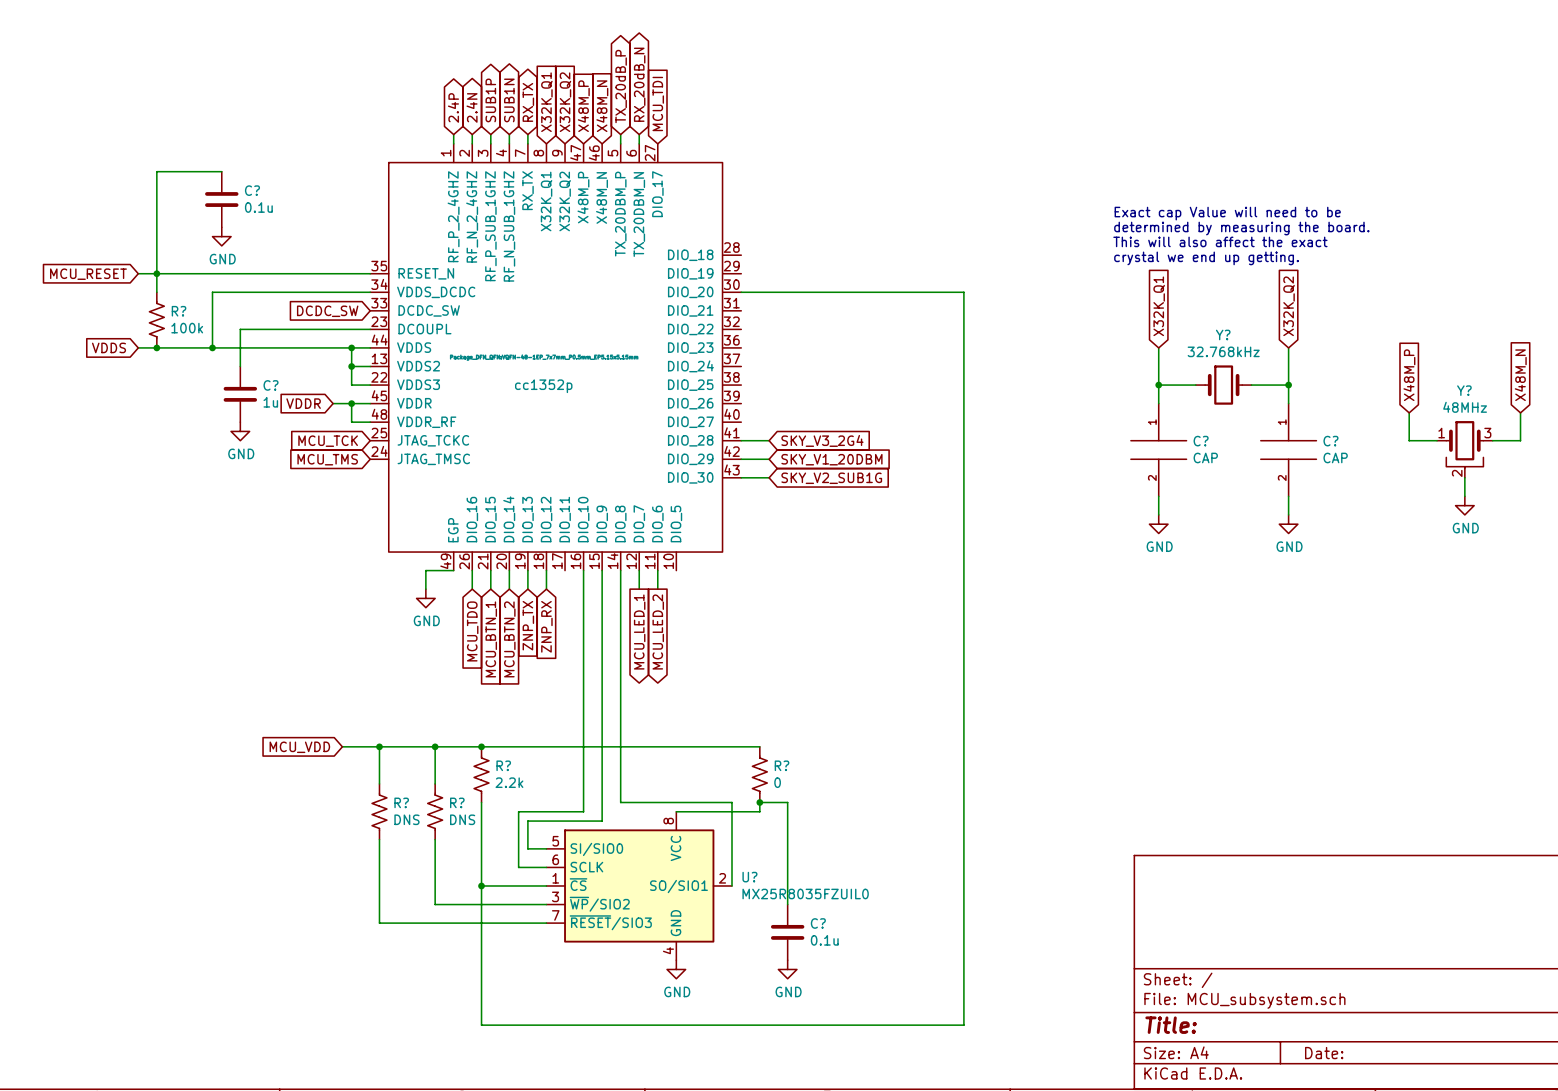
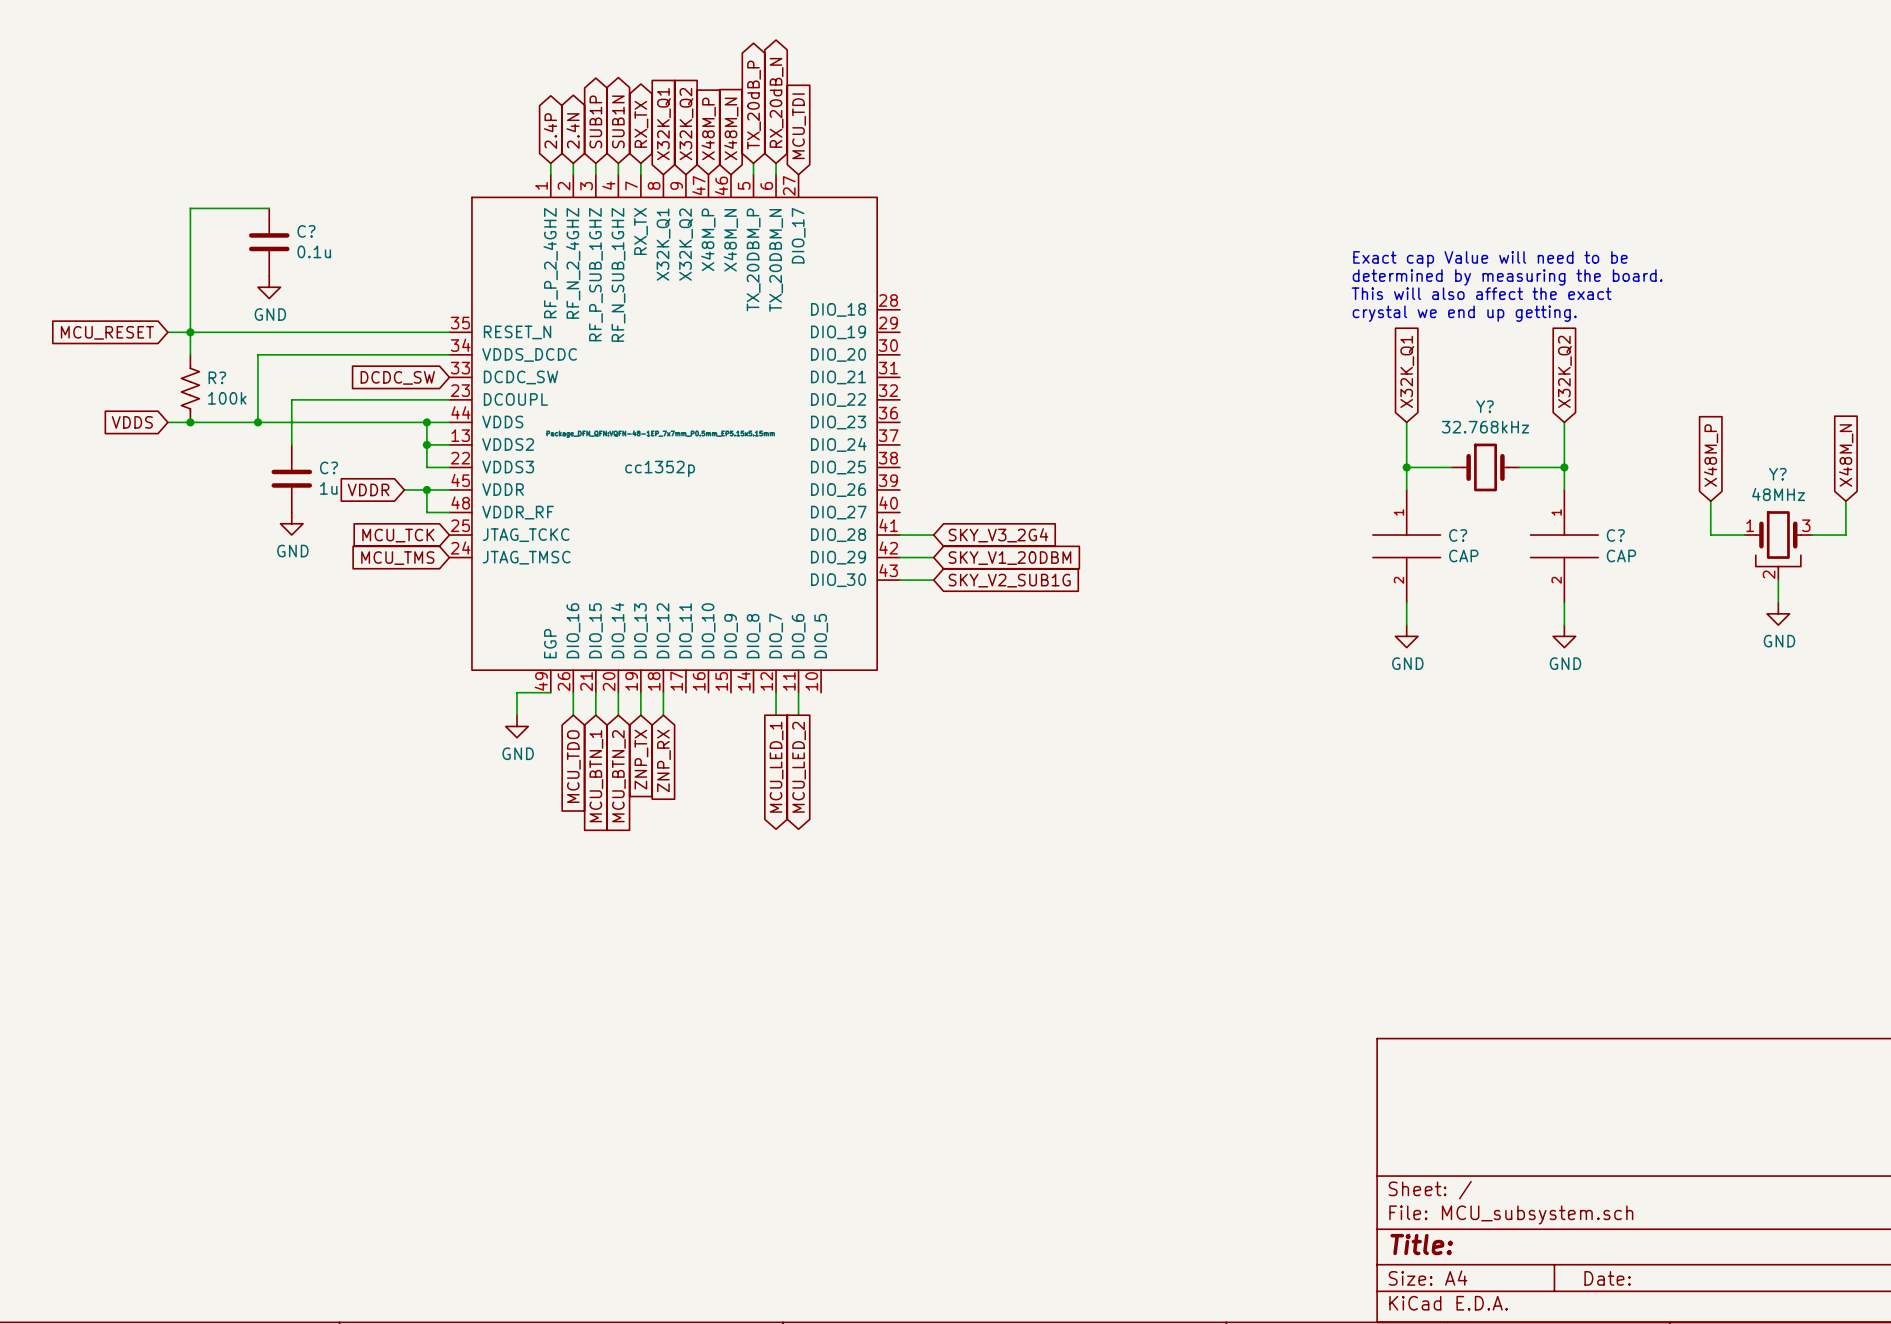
wire: (741, 292) (963, 292) (963, 1025) (481, 1025) (481, 802) -> none
wire: (583, 570) (583, 811) (518, 811) (518, 867) (546, 867) -> none
wire: (602, 570) (602, 821) (527, 821) (527, 848) (546, 848) -> none
wire: (620, 570) (620, 802) (732, 802) (732, 885) -> none
wire: (342, 746) (759, 746) -> none
wire: (379, 746) (379, 783) -> none
junction: (379, 746) -> none
wire: (435, 746) (435, 783) -> none
junction: (435, 746) -> none
junction: (481, 746) -> none
global label: MCU_VDD (299, 747) -> none
R?: 2.2k (481, 774) -> none
R?: 0 (759, 774) -> none
junction: (759, 802) -> none
R?: DNS (379, 811) -> none
R?: DNS (435, 811) -> none
wire: (676, 811) (759, 811) (759, 802) (787, 802) (787, 904) -> none
wire: (379, 839) (379, 923) (546, 923) -> none
wire: (435, 839) (435, 904) (546, 904) -> none
wire: (481, 885) (546, 885) -> none
junction: (481, 885) -> none
U?: MX25R8035FZUIL0 (639, 885) -> none
C?: 0.1u (787, 932) -> none
power symbol: GND (676, 969) -> none
power symbol: GND (787, 969) -> none

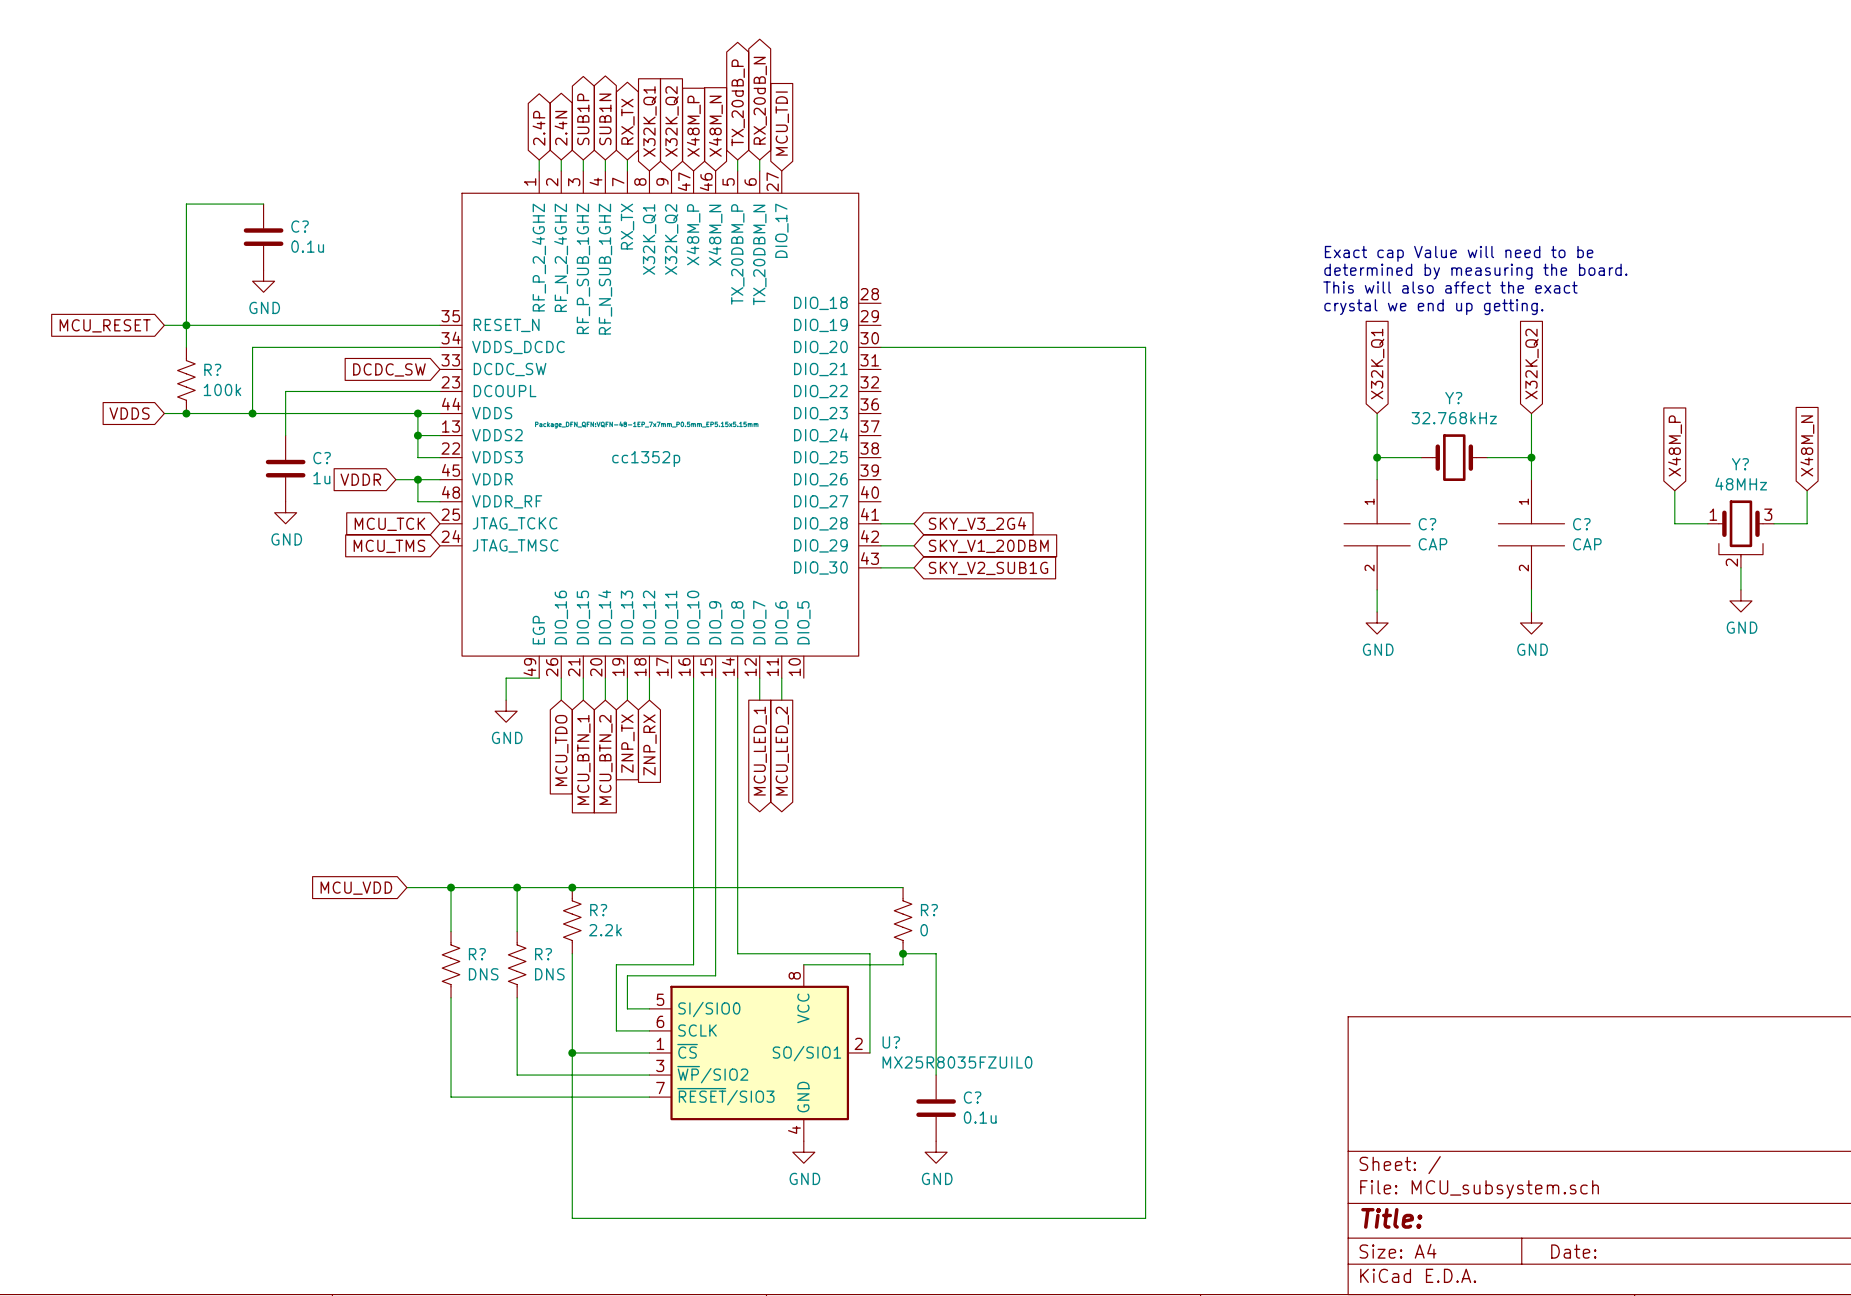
wire: none -> (880, 347) (1145, 347) (1145, 1218) (572, 1218) (572, 953)
wire: none -> (693, 678) (693, 964) (616, 964) (616, 1030) (649, 1030)
wire: none -> (715, 678) (715, 975) (627, 975) (627, 1008) (649, 1008)
wire: none -> (737, 678) (737, 953) (869, 953) (869, 1052)
wire: none -> (406, 887) (903, 887)
wire: none -> (451, 887) (451, 931)
junction: none -> (451, 887)
wire: none -> (517, 887) (517, 931)
junction: none -> (517, 887)
junction: none -> (572, 887)
global label: none -> MCU_VDD (356, 888)
R?: none -> 2.2k (572, 920)
R?: none -> 0 (903, 920)
junction: none -> (903, 953)
R?: none -> DNS (451, 964)
R?: none -> DNS (517, 964)
wire: none -> (803, 964) (903, 964) (903, 953) (936, 953) (936, 1075)
wire: none -> (451, 997) (451, 1097) (649, 1097)
wire: none -> (517, 997) (517, 1075) (649, 1075)
wire: none -> (572, 1052) (649, 1052)
junction: none -> (572, 1052)
U?: none -> MX25R8035FZUIL0 (759, 1052)
C?: none -> 0.1u (936, 1108)
power symbol: none -> GND (803, 1152)
power symbol: none -> GND (936, 1152)

